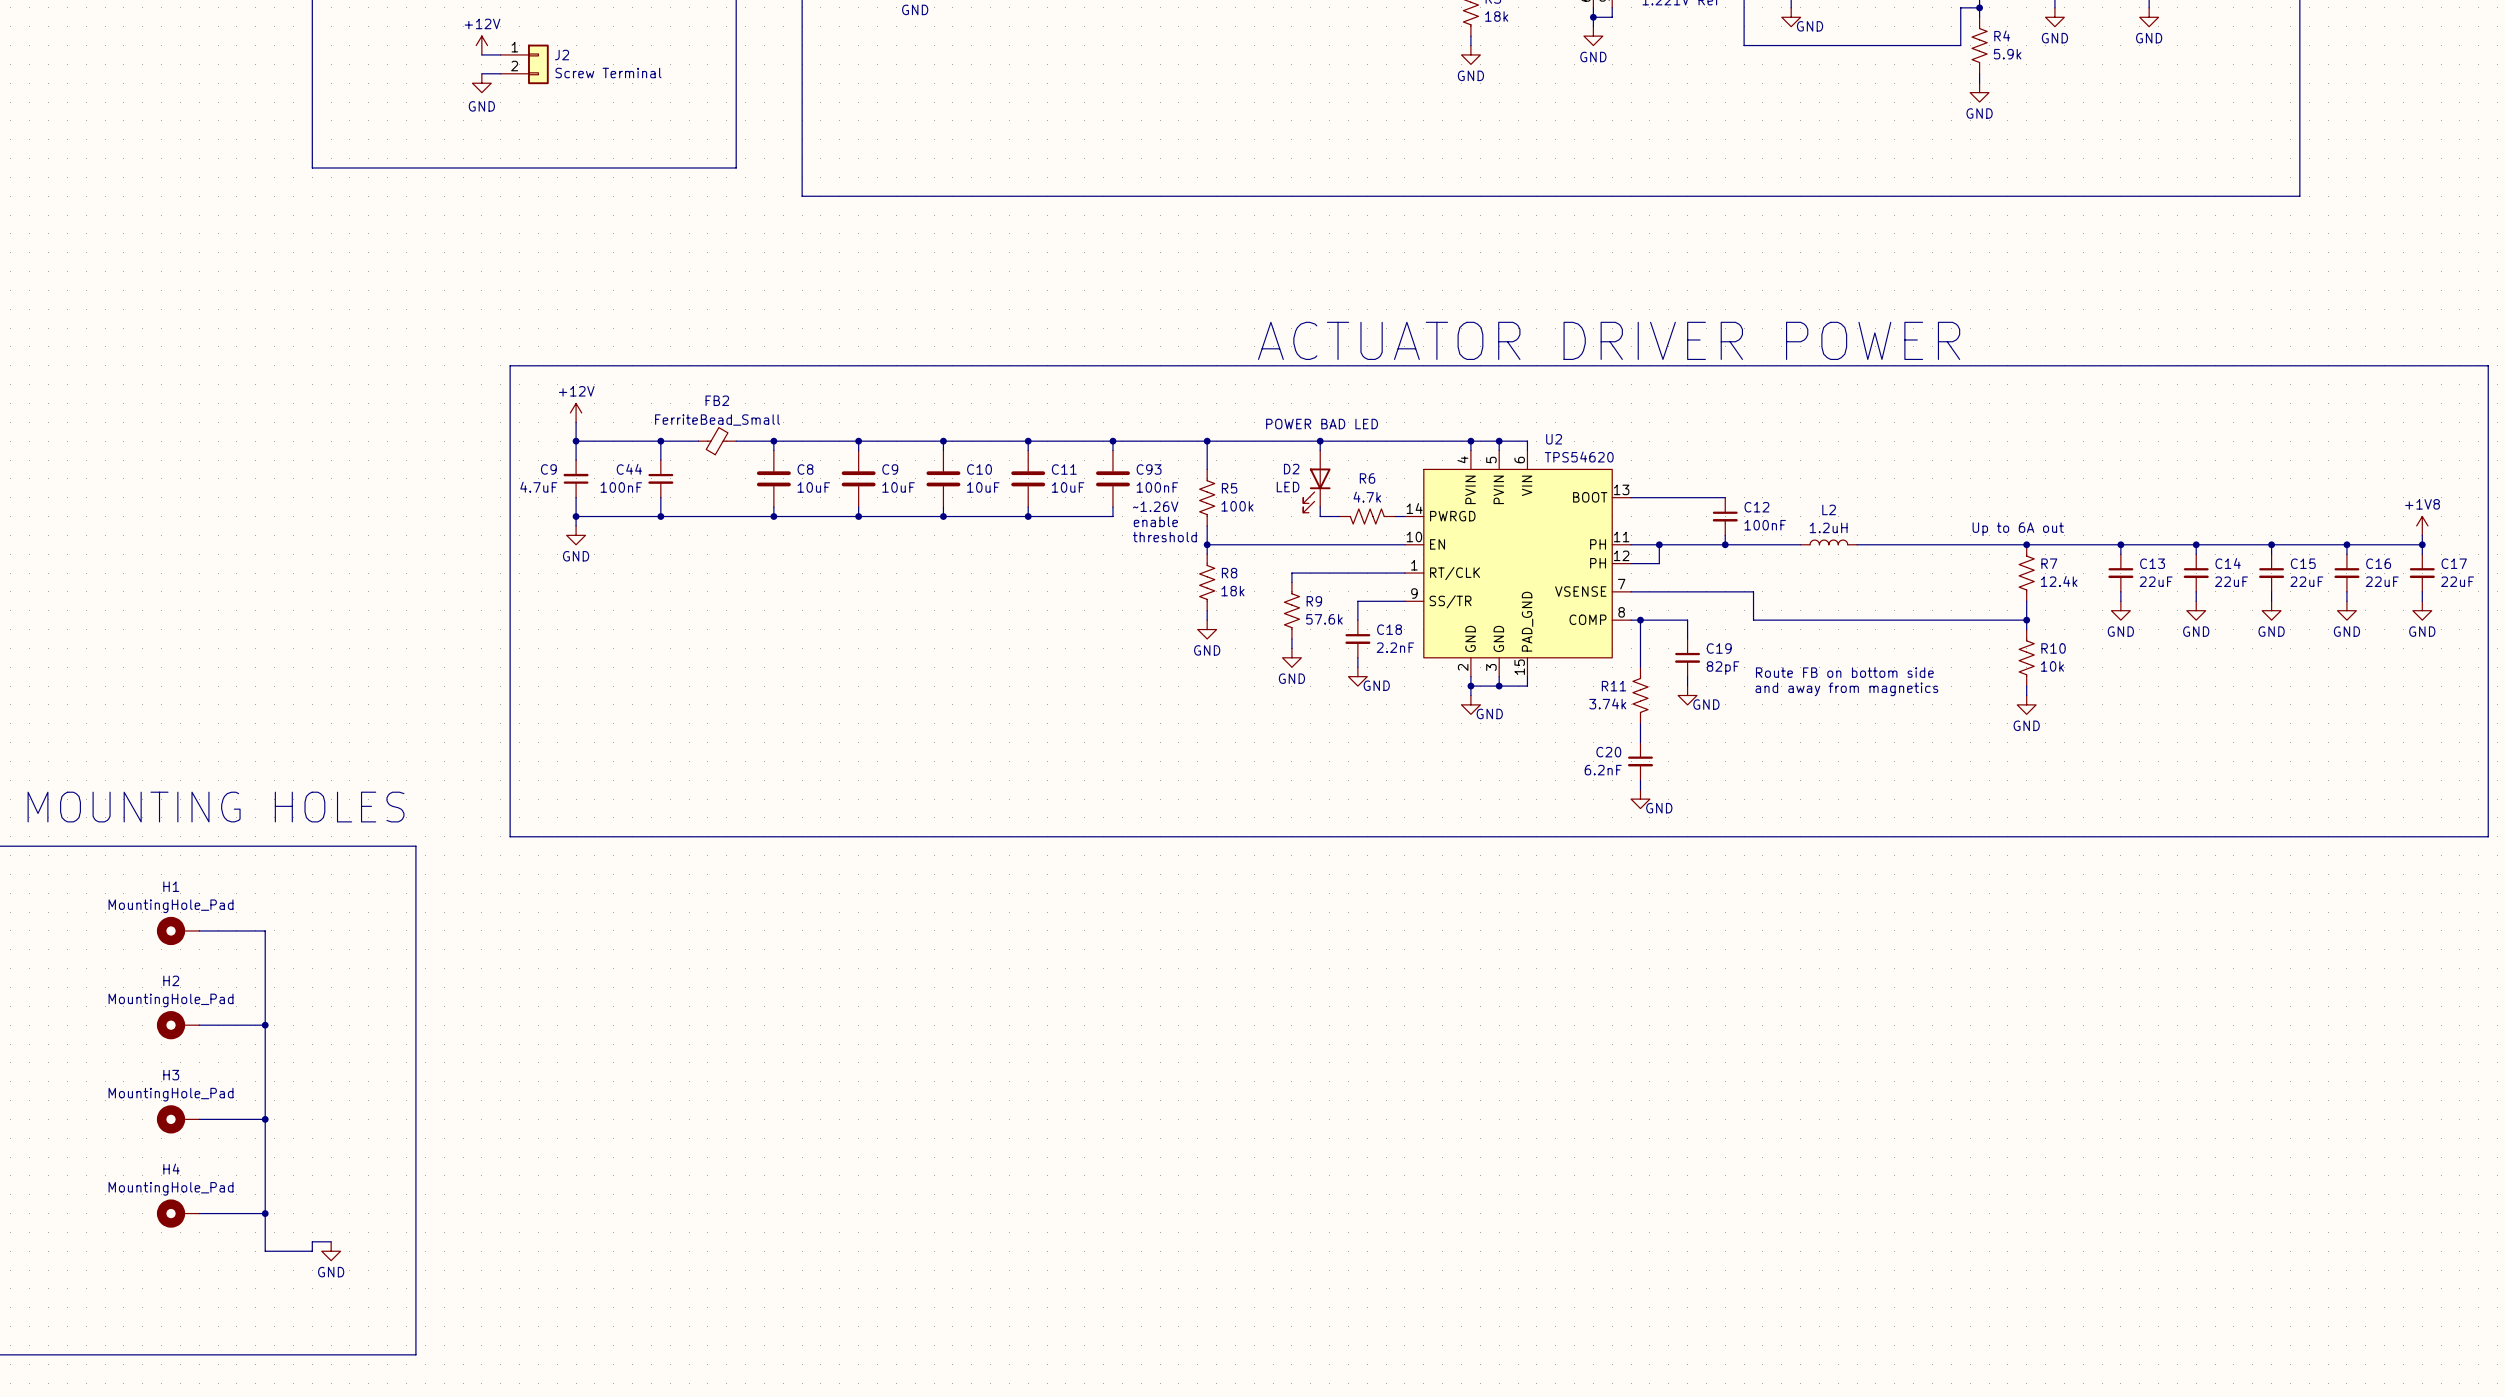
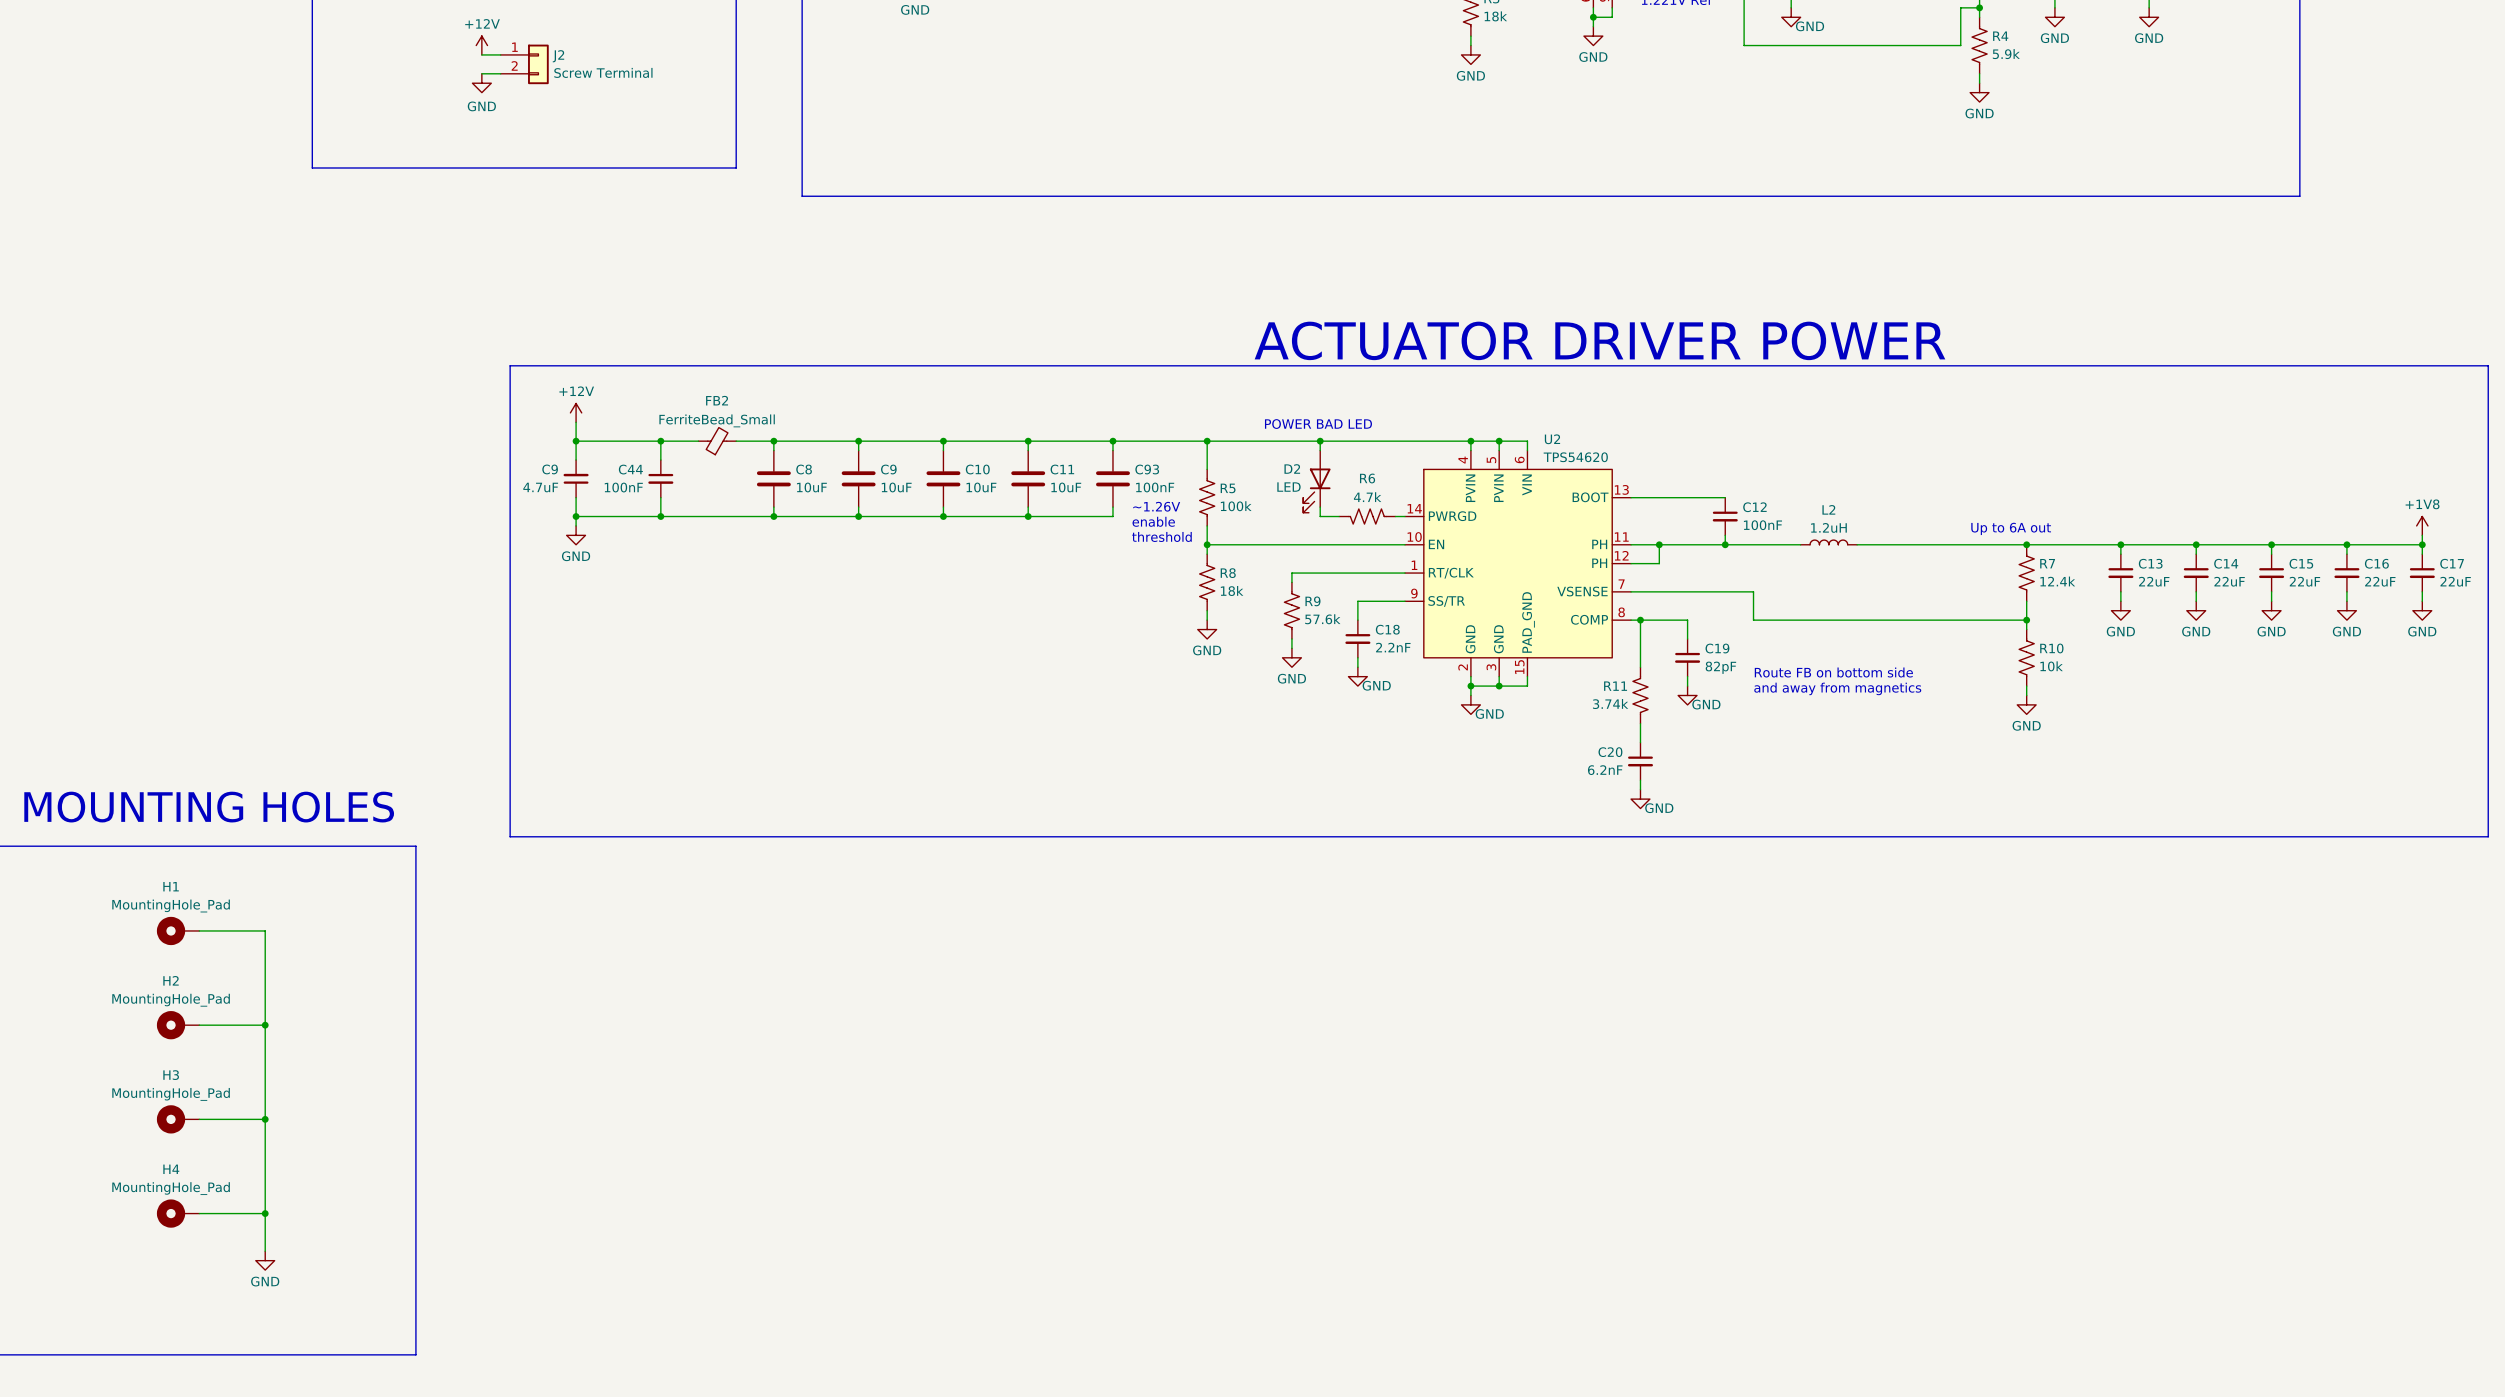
wire: (331, 1241) (312, 1241) (312, 1251) (265, 1251) -> none
power symbol position: GND (331, 1251) -> GND (265, 1260)

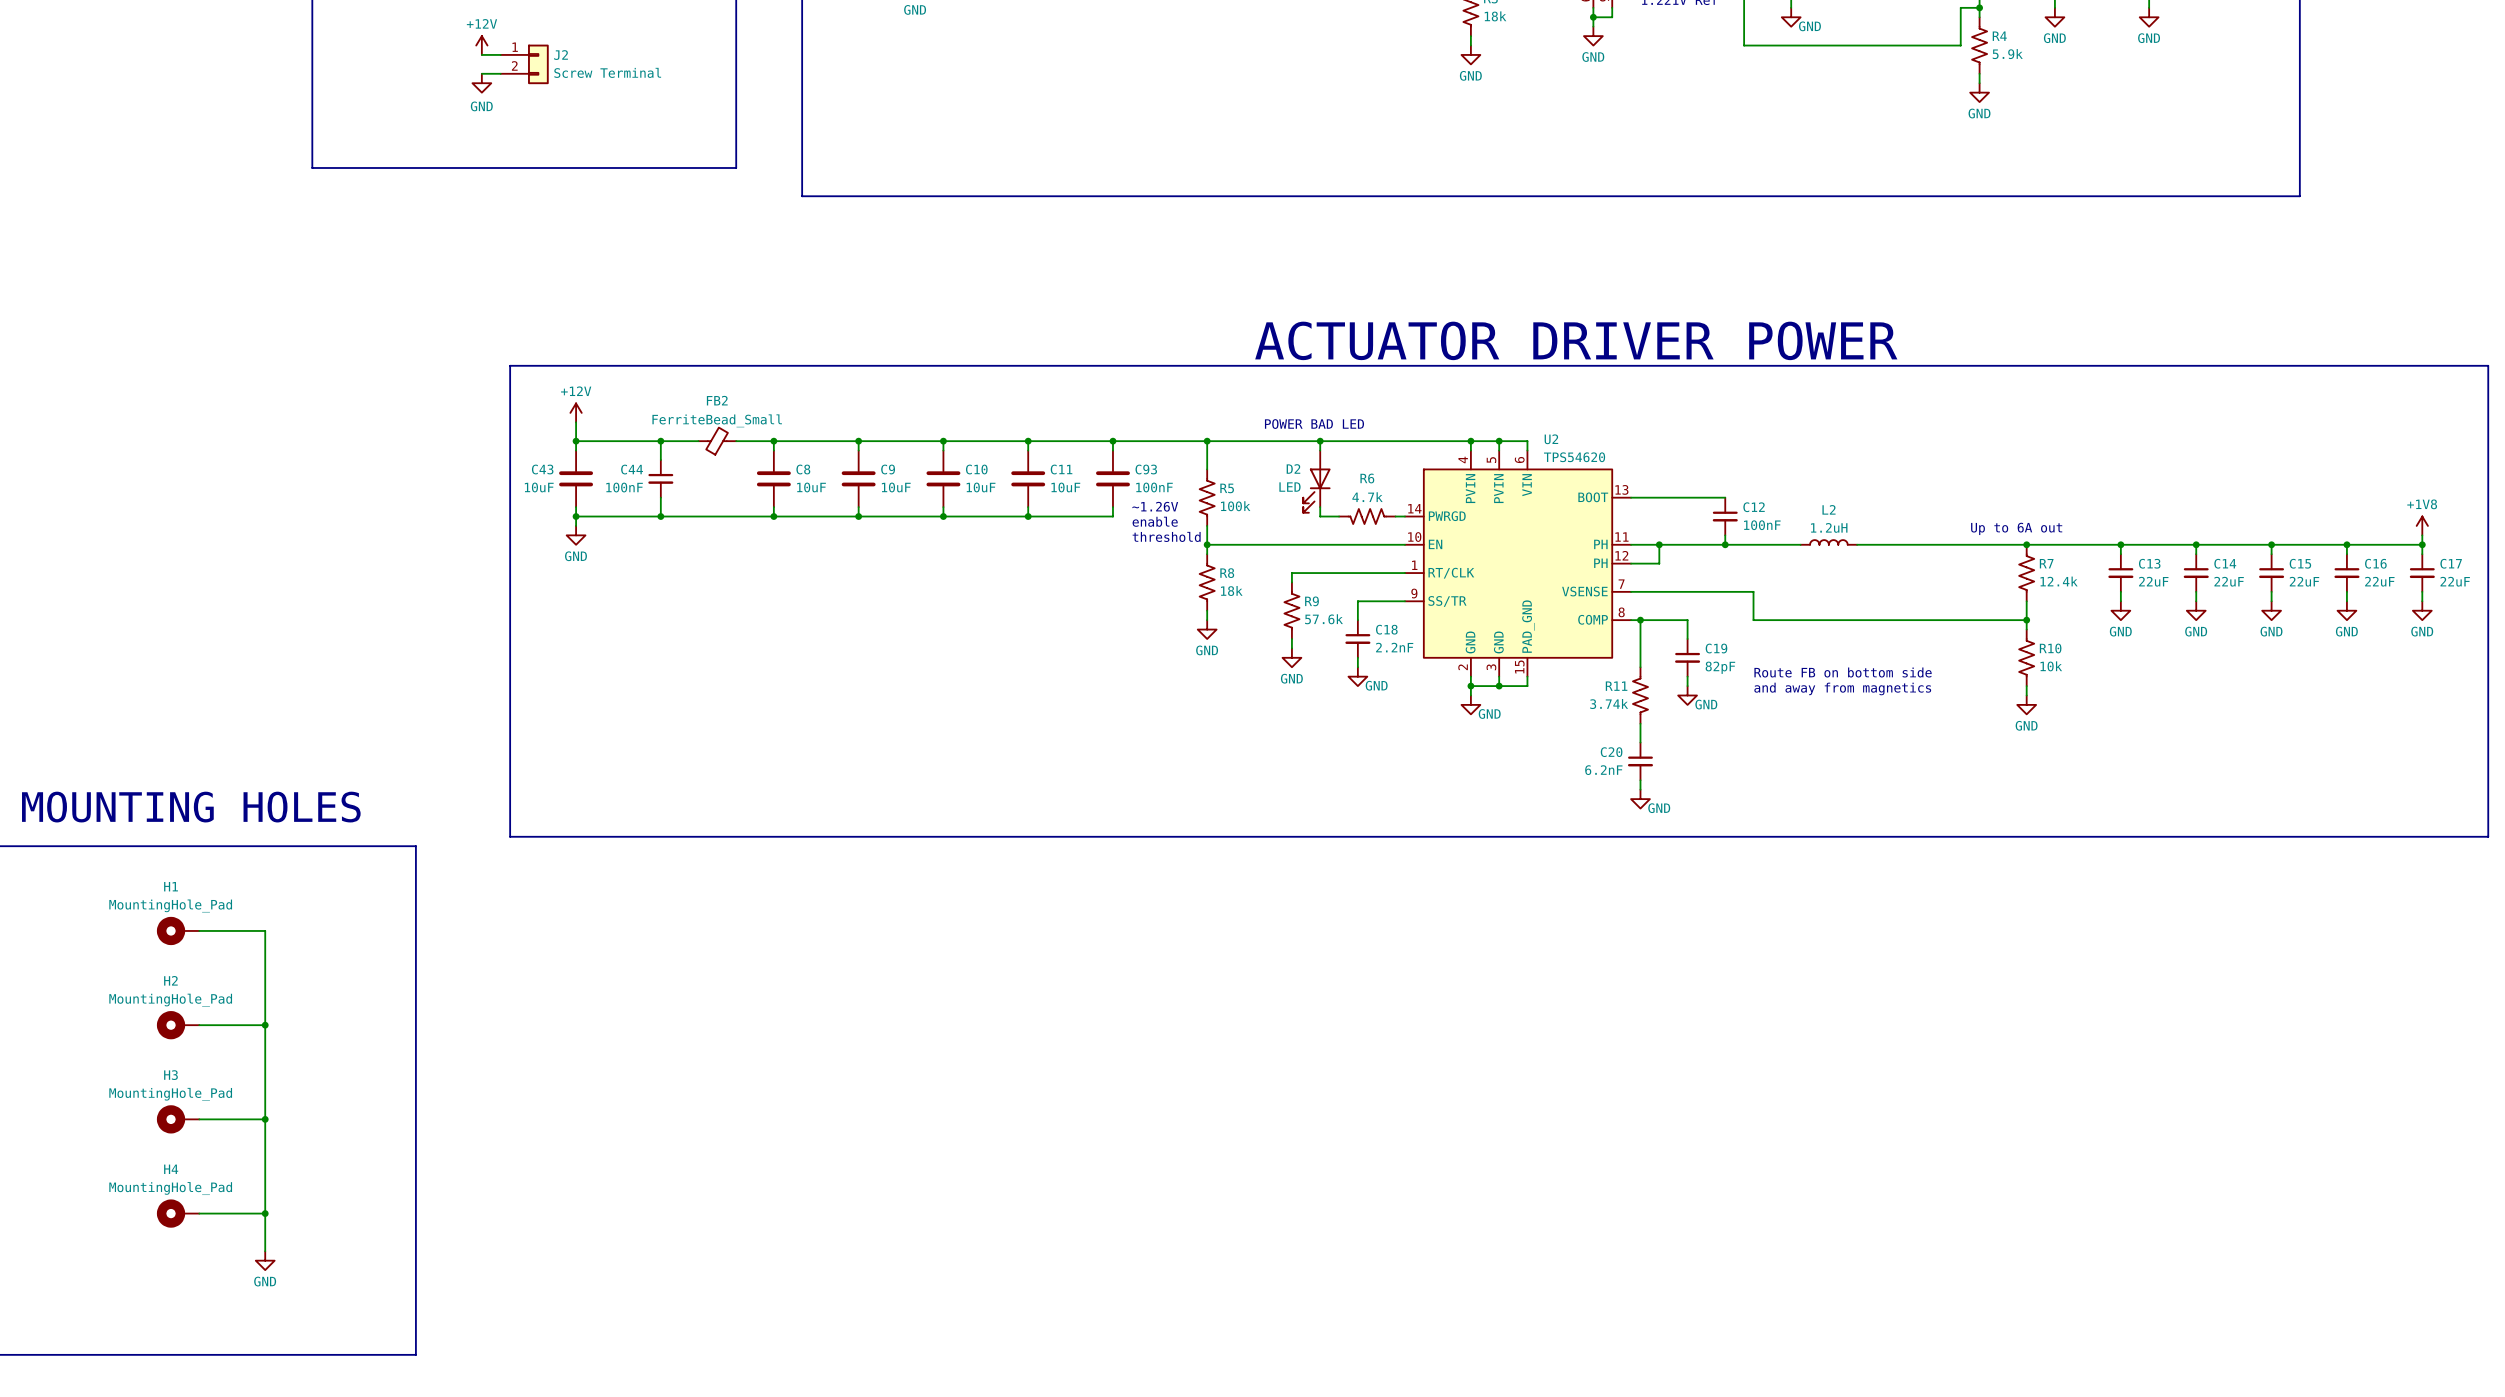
C9: 4.7uF (576, 478) -> none
C43: none -> 10uF (576, 478)

